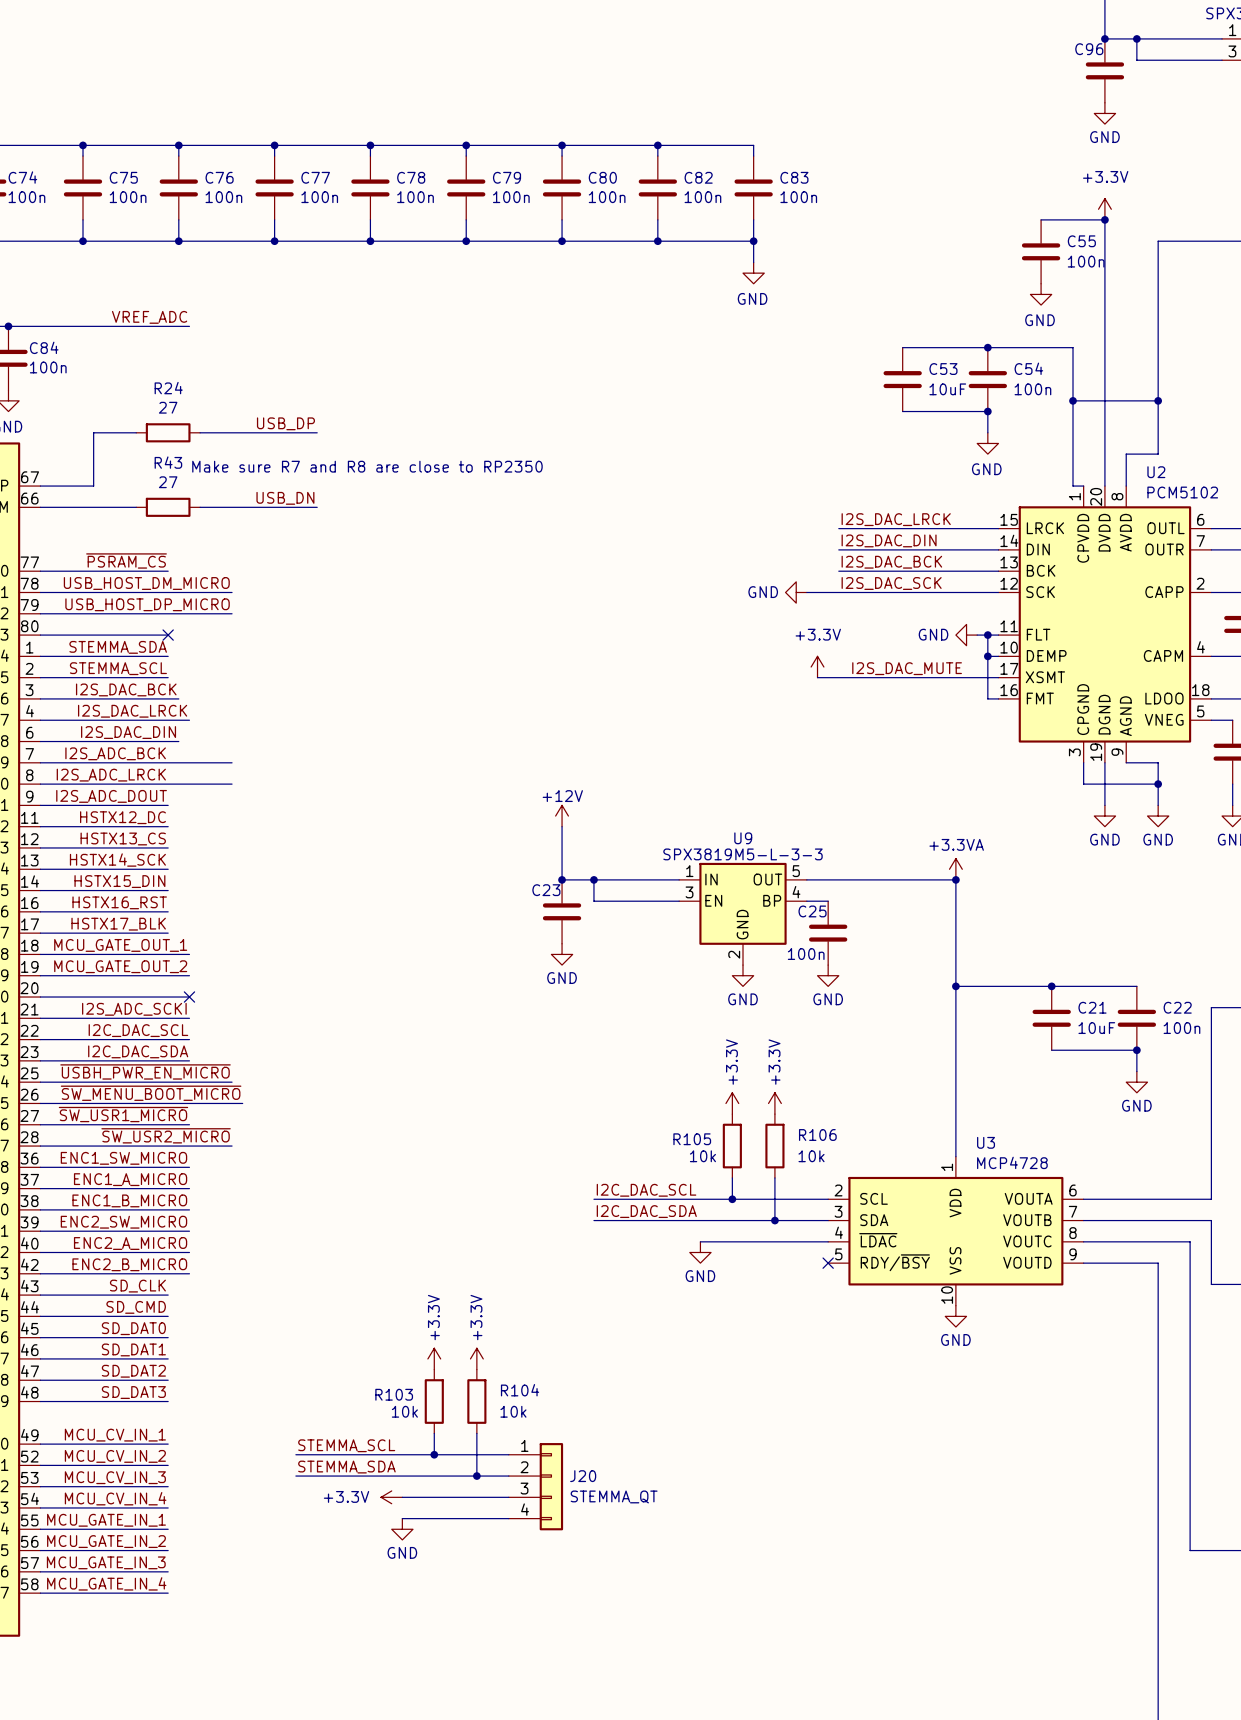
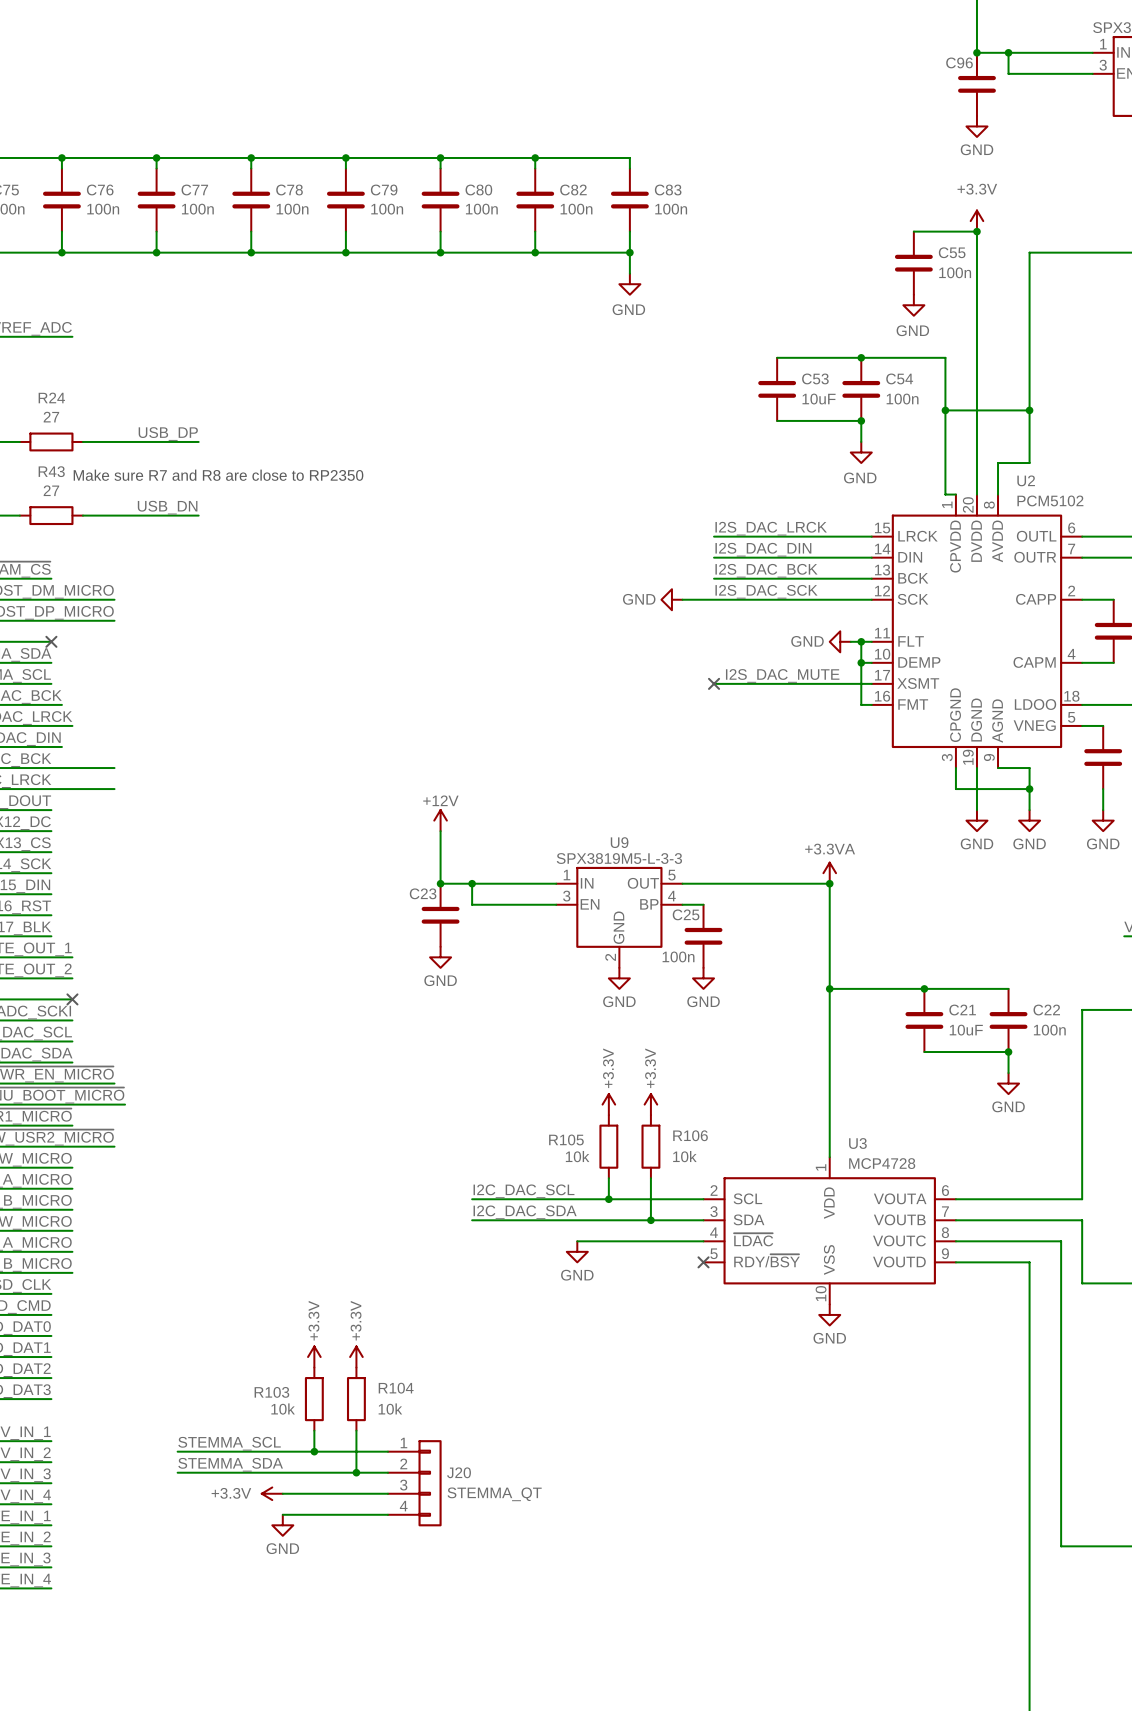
power symbol: +3.3V (817, 667) -> none
wire: (817, 677) (838, 677) -> none
no-connect mark: none -> (714, 683)

